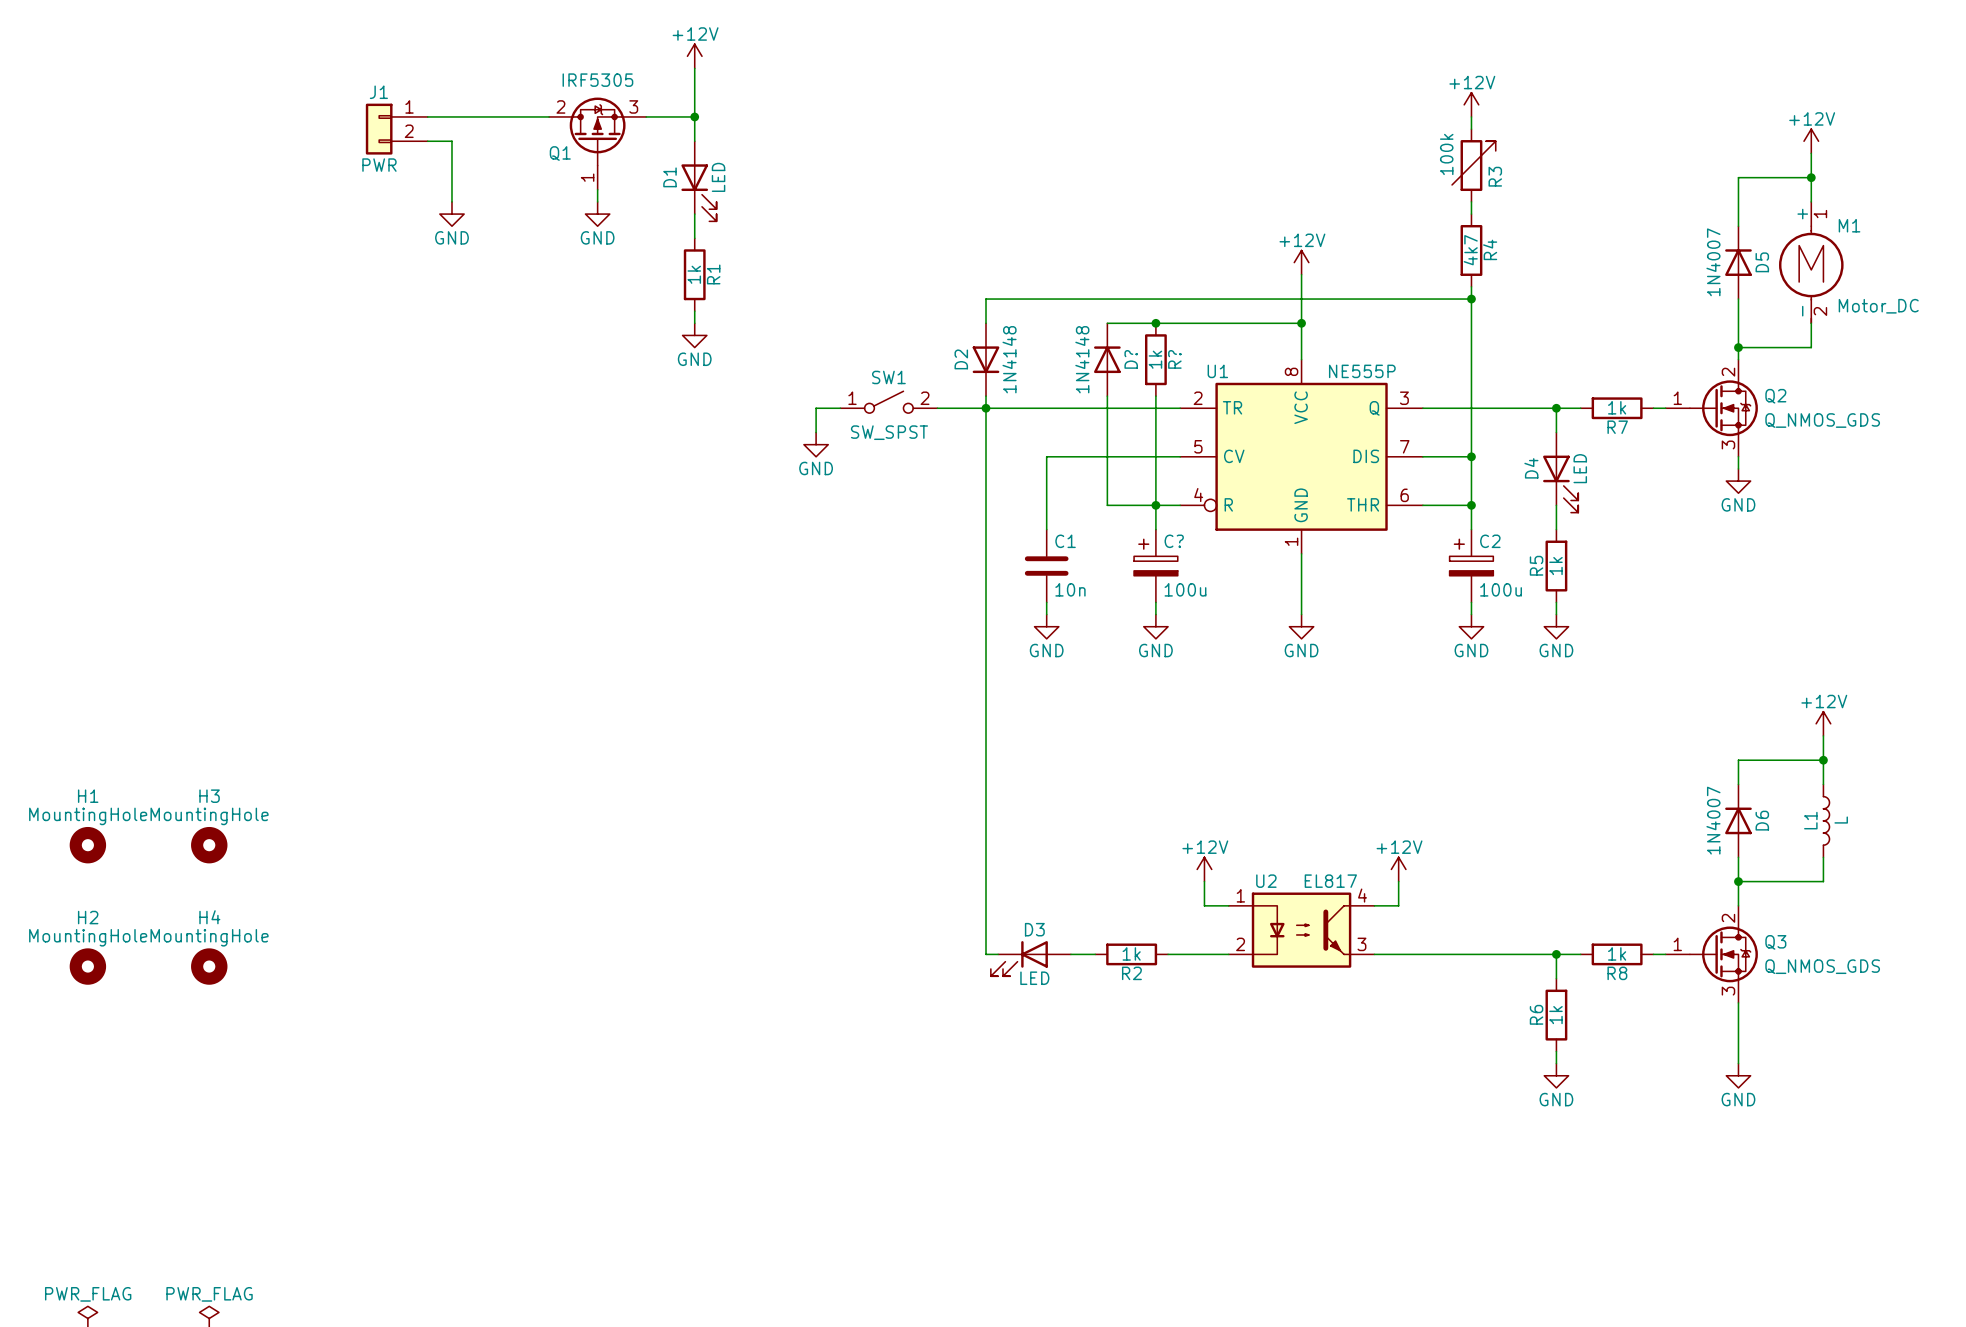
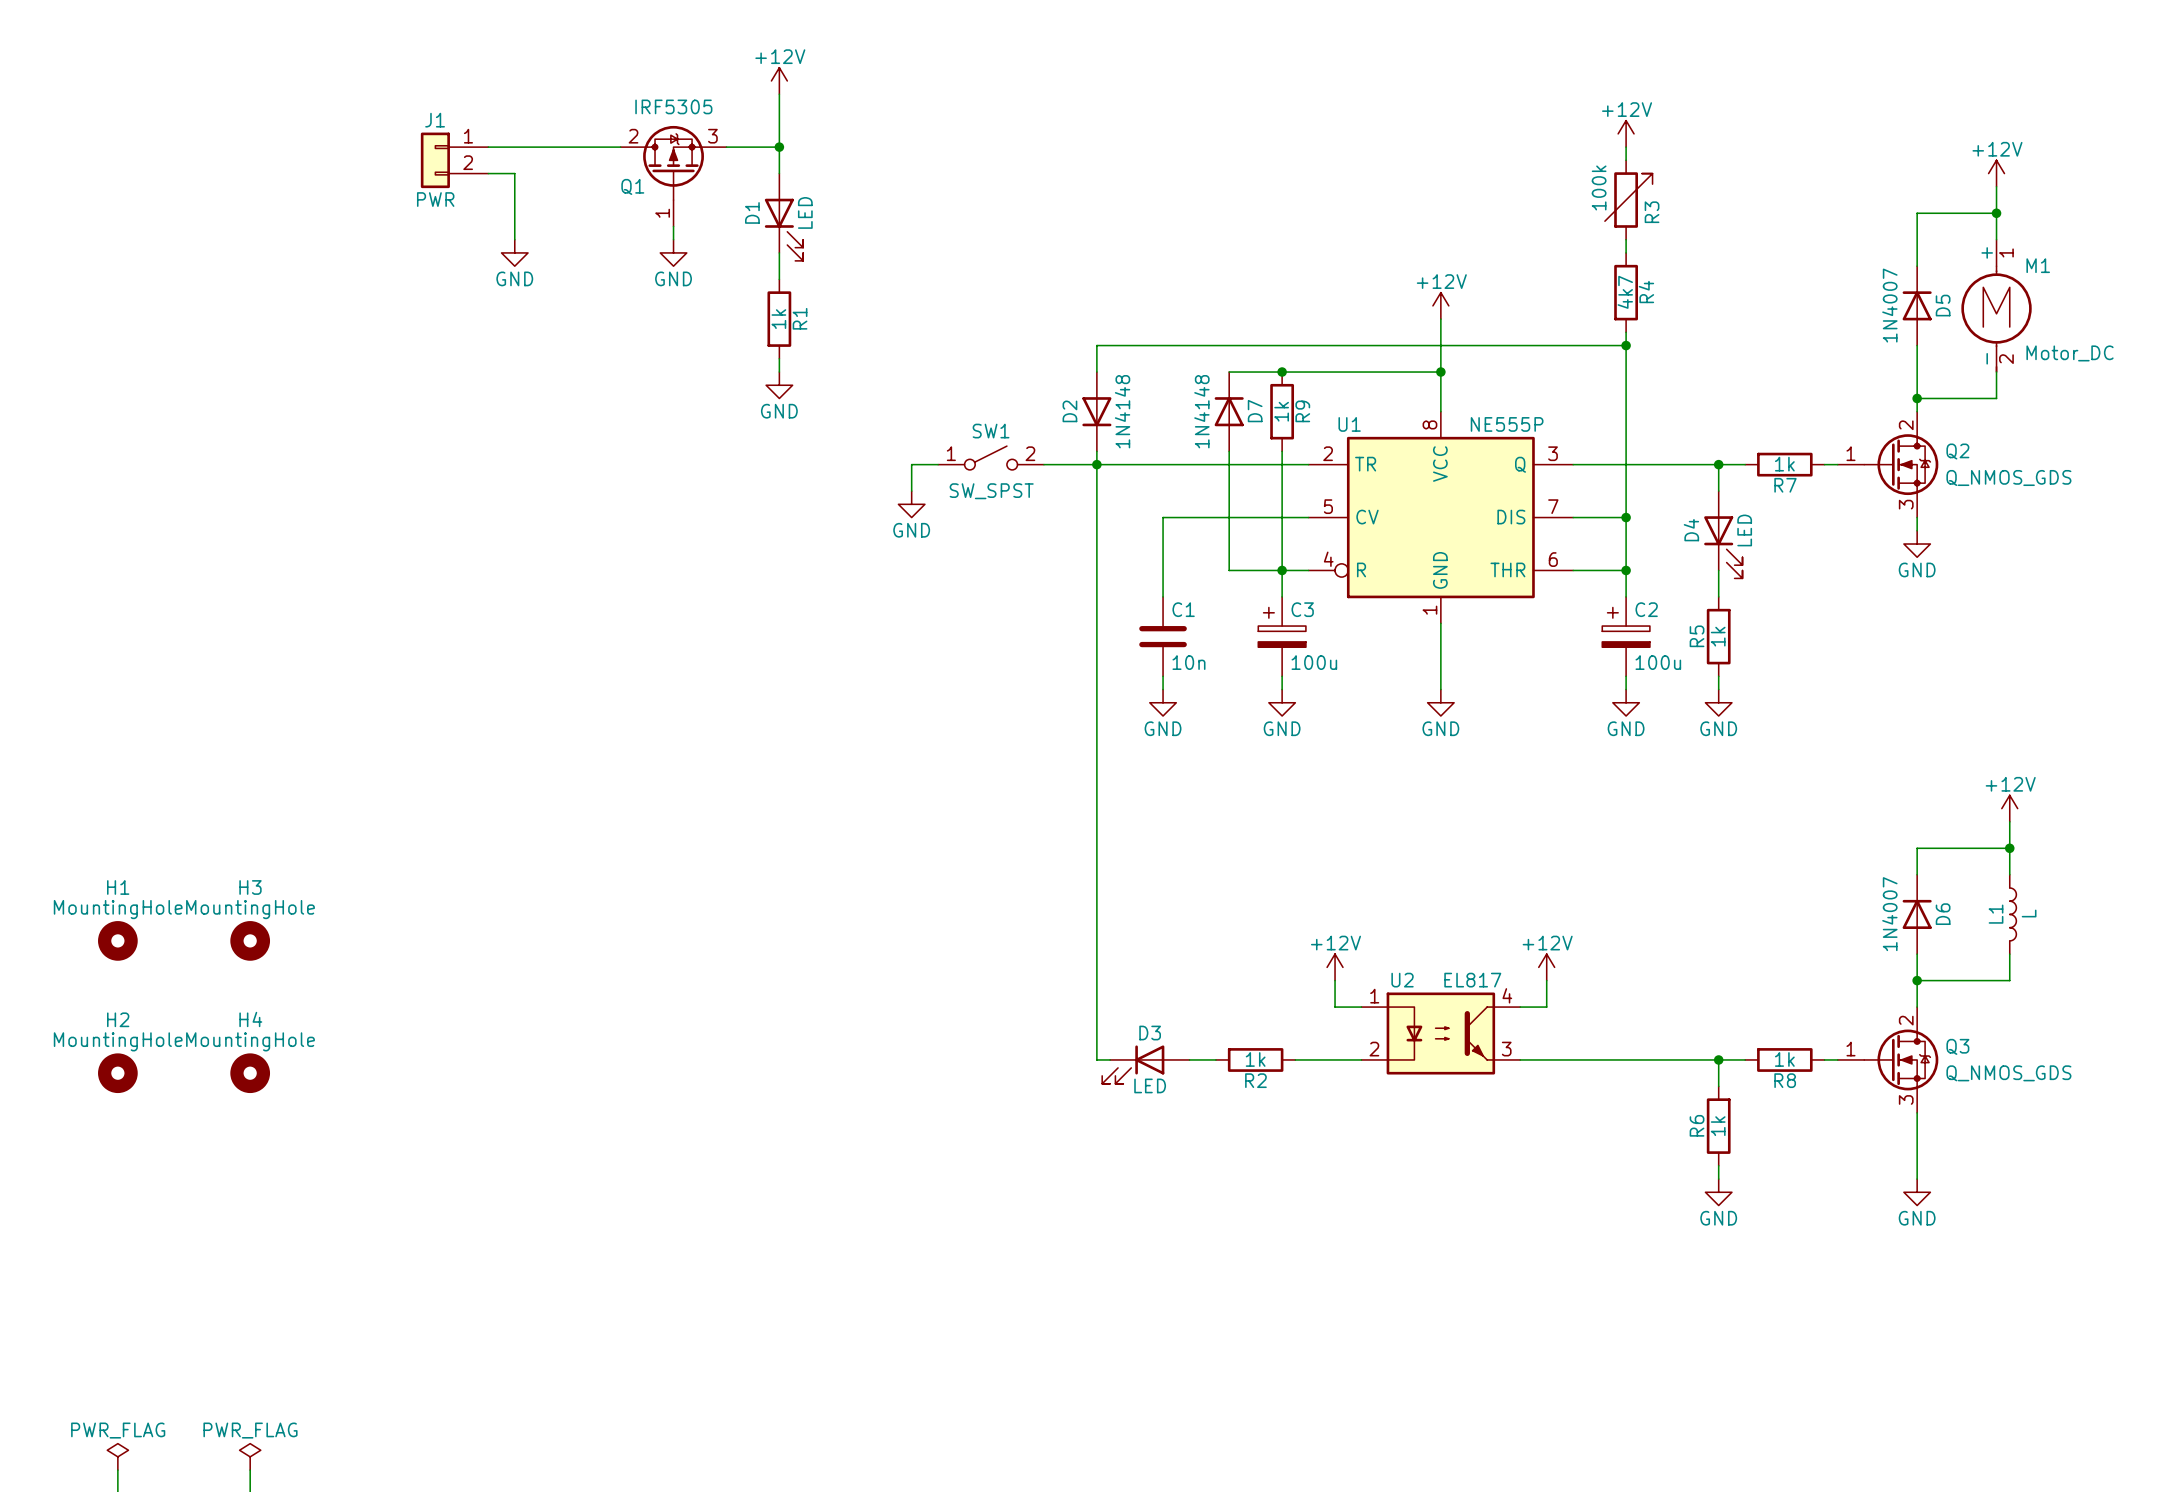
D? name: D? (1131, 359) -> D7 (1255, 411)
R? name: R? (1174, 359) -> R9 (1302, 411)
C? name: C? (1174, 541) -> C3 (1302, 609)

